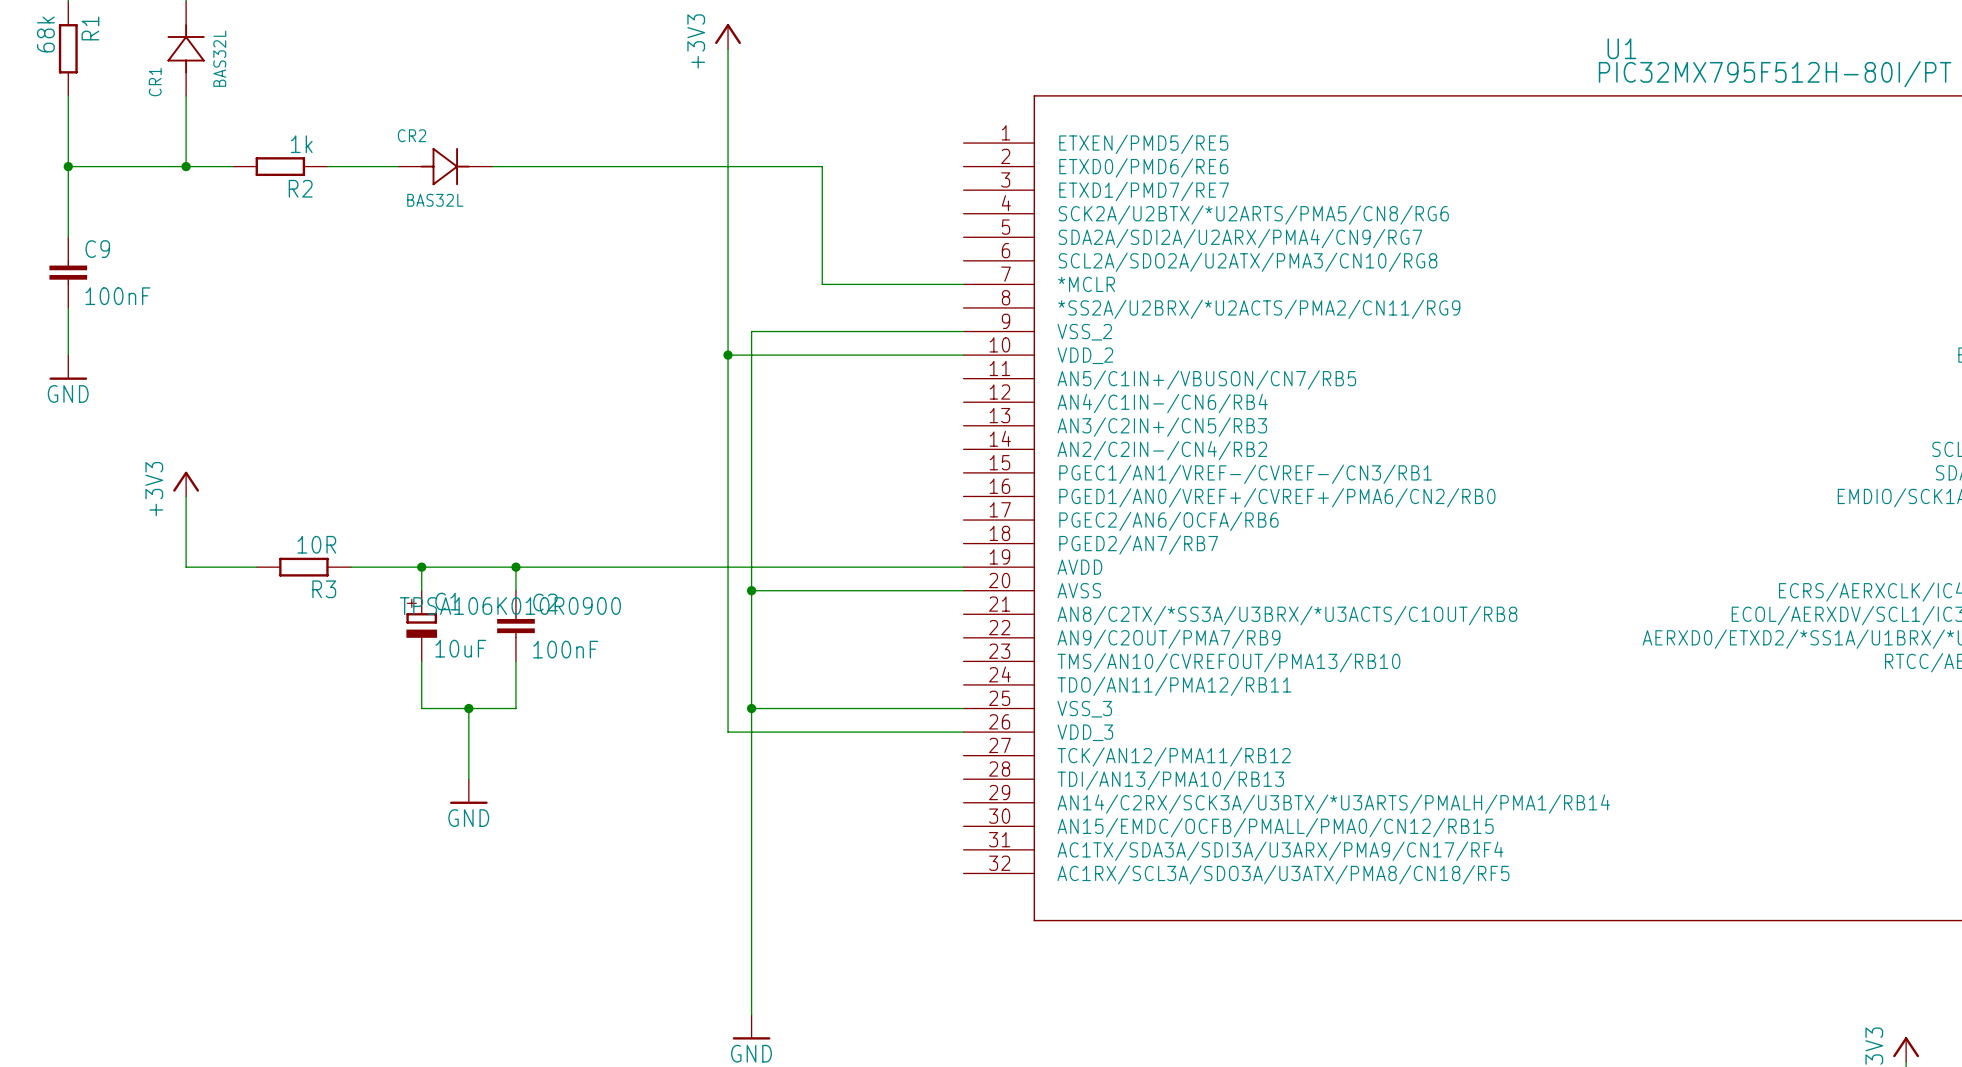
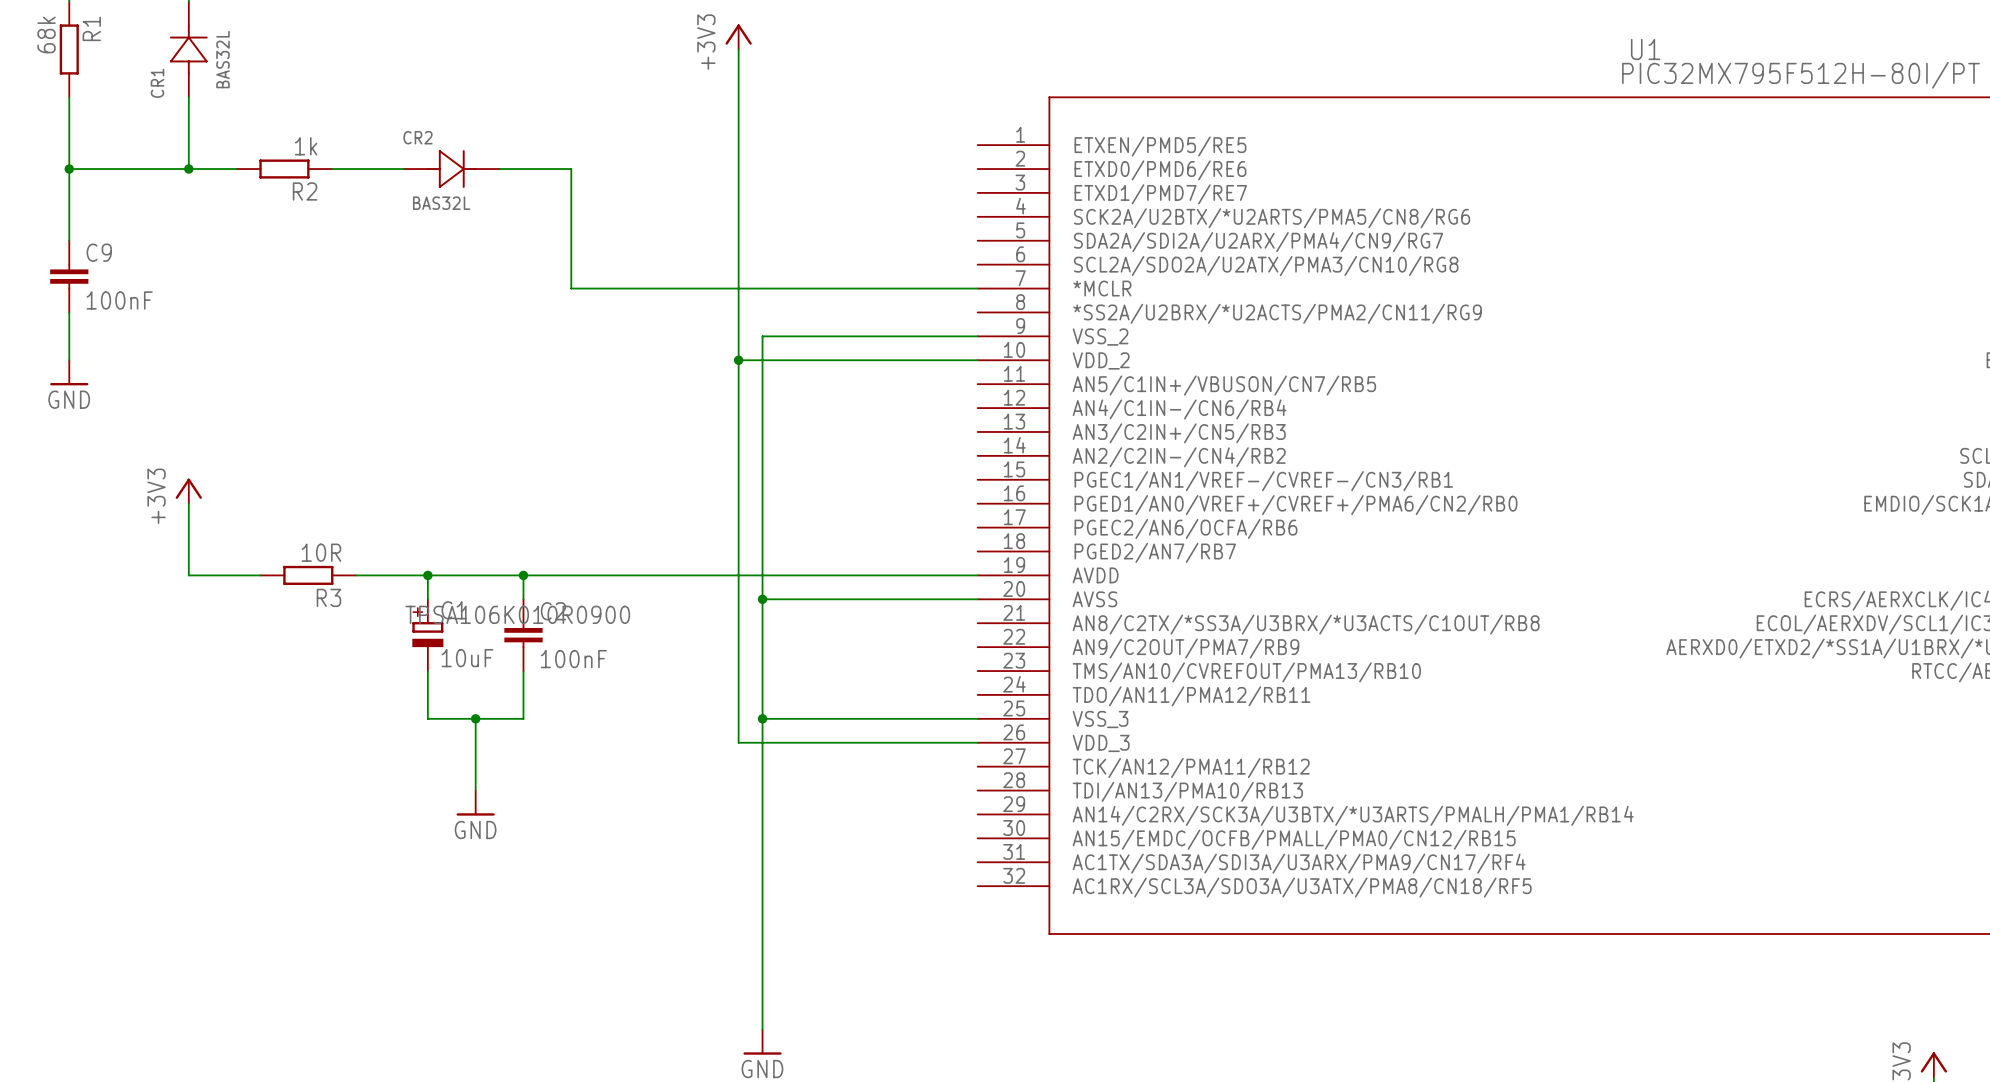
wire: (563, 166) (822, 166) (822, 284) -> (571, 169) (571, 288) (834, 288)

